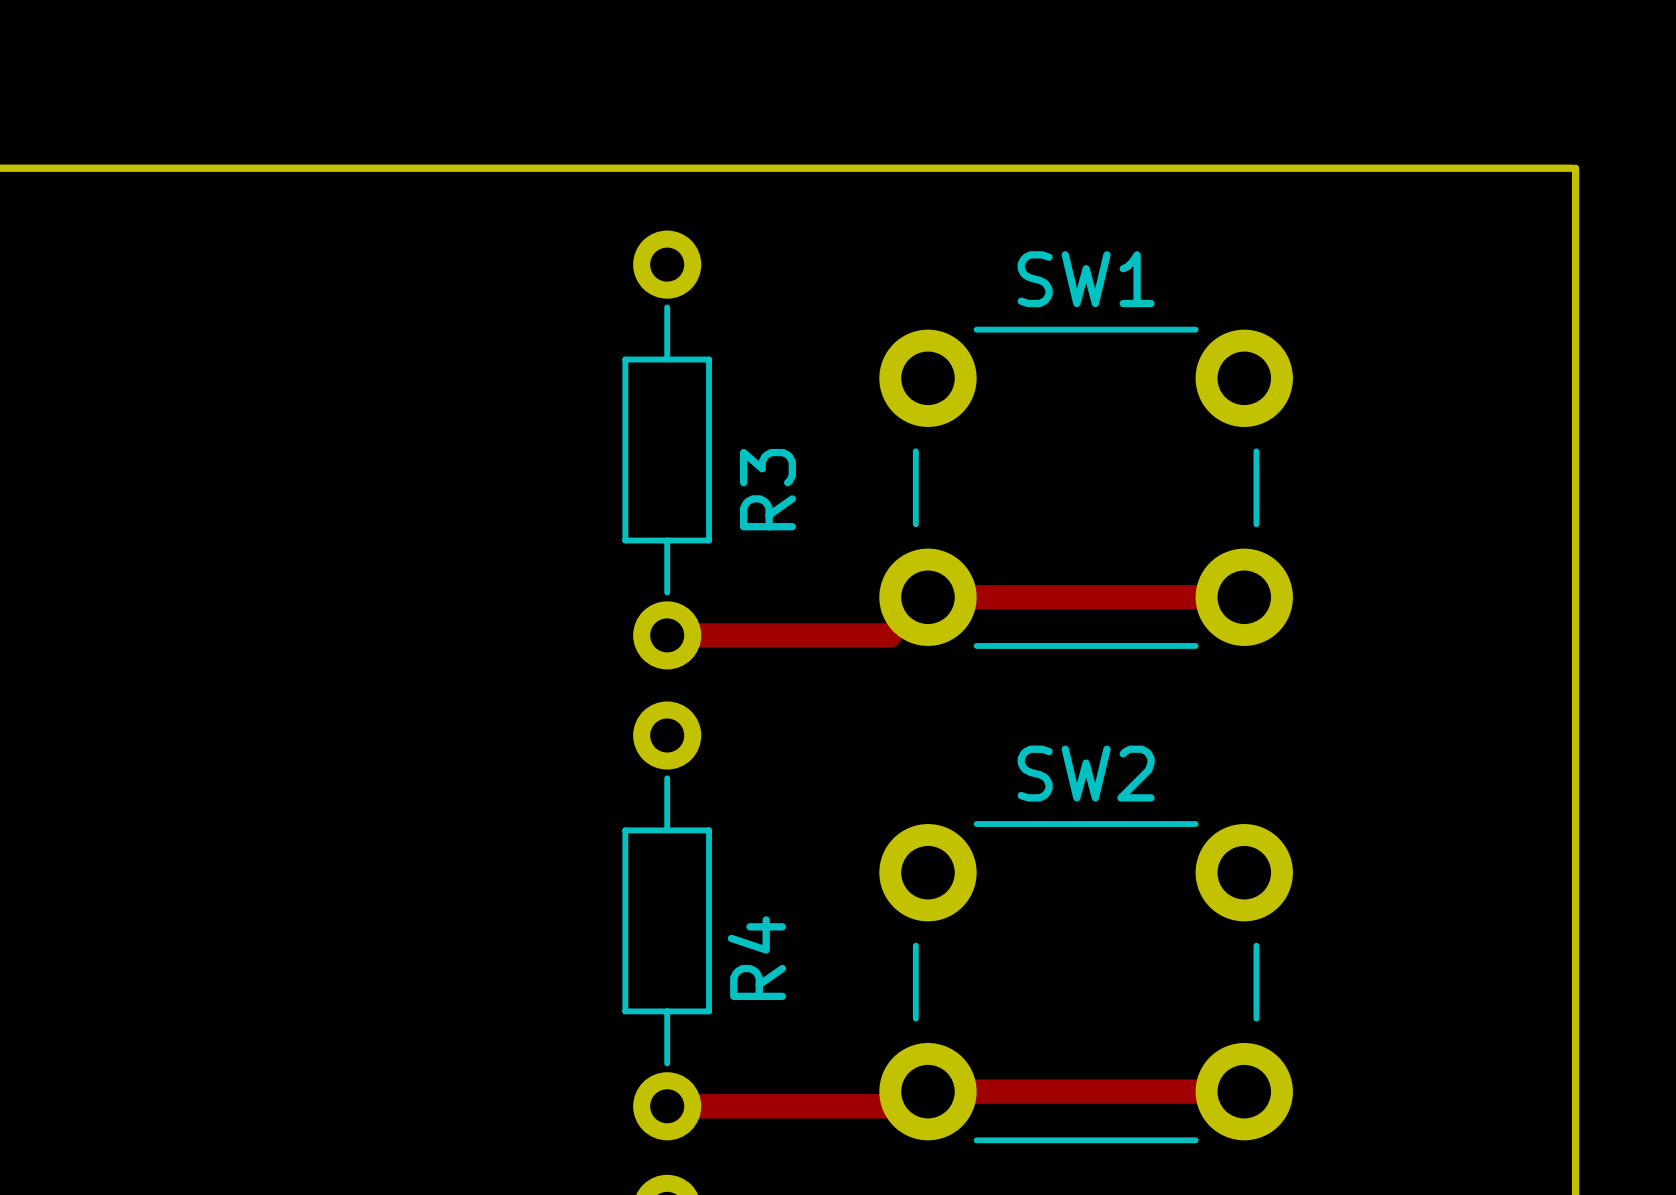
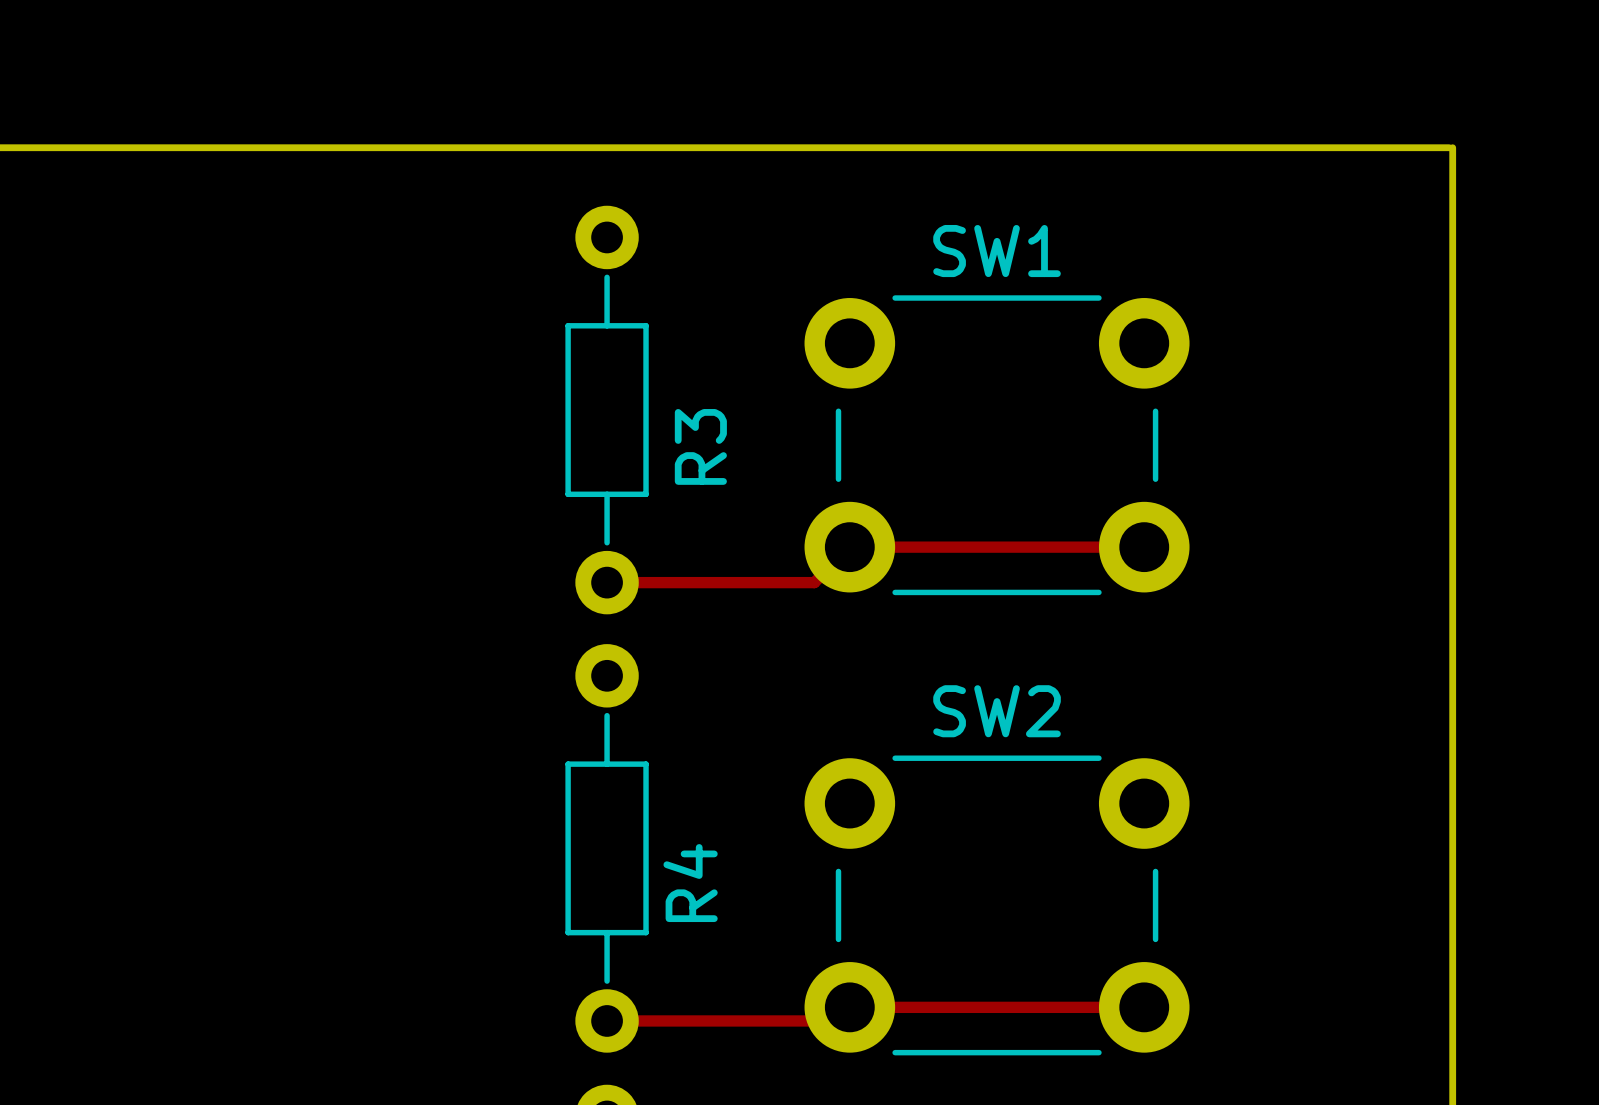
track width: thick (927, 597) (1244, 597) -> thin (849, 547) (1144, 547)
track width: thick (667, 635) (889, 635) -> thin (607, 582) (814, 582)
track width: thick (927, 1091) (1244, 1091) -> thin (849, 1007) (1144, 1007)
track width: thick (667, 1106) (913, 1106) -> thin (607, 1020) (836, 1020)

